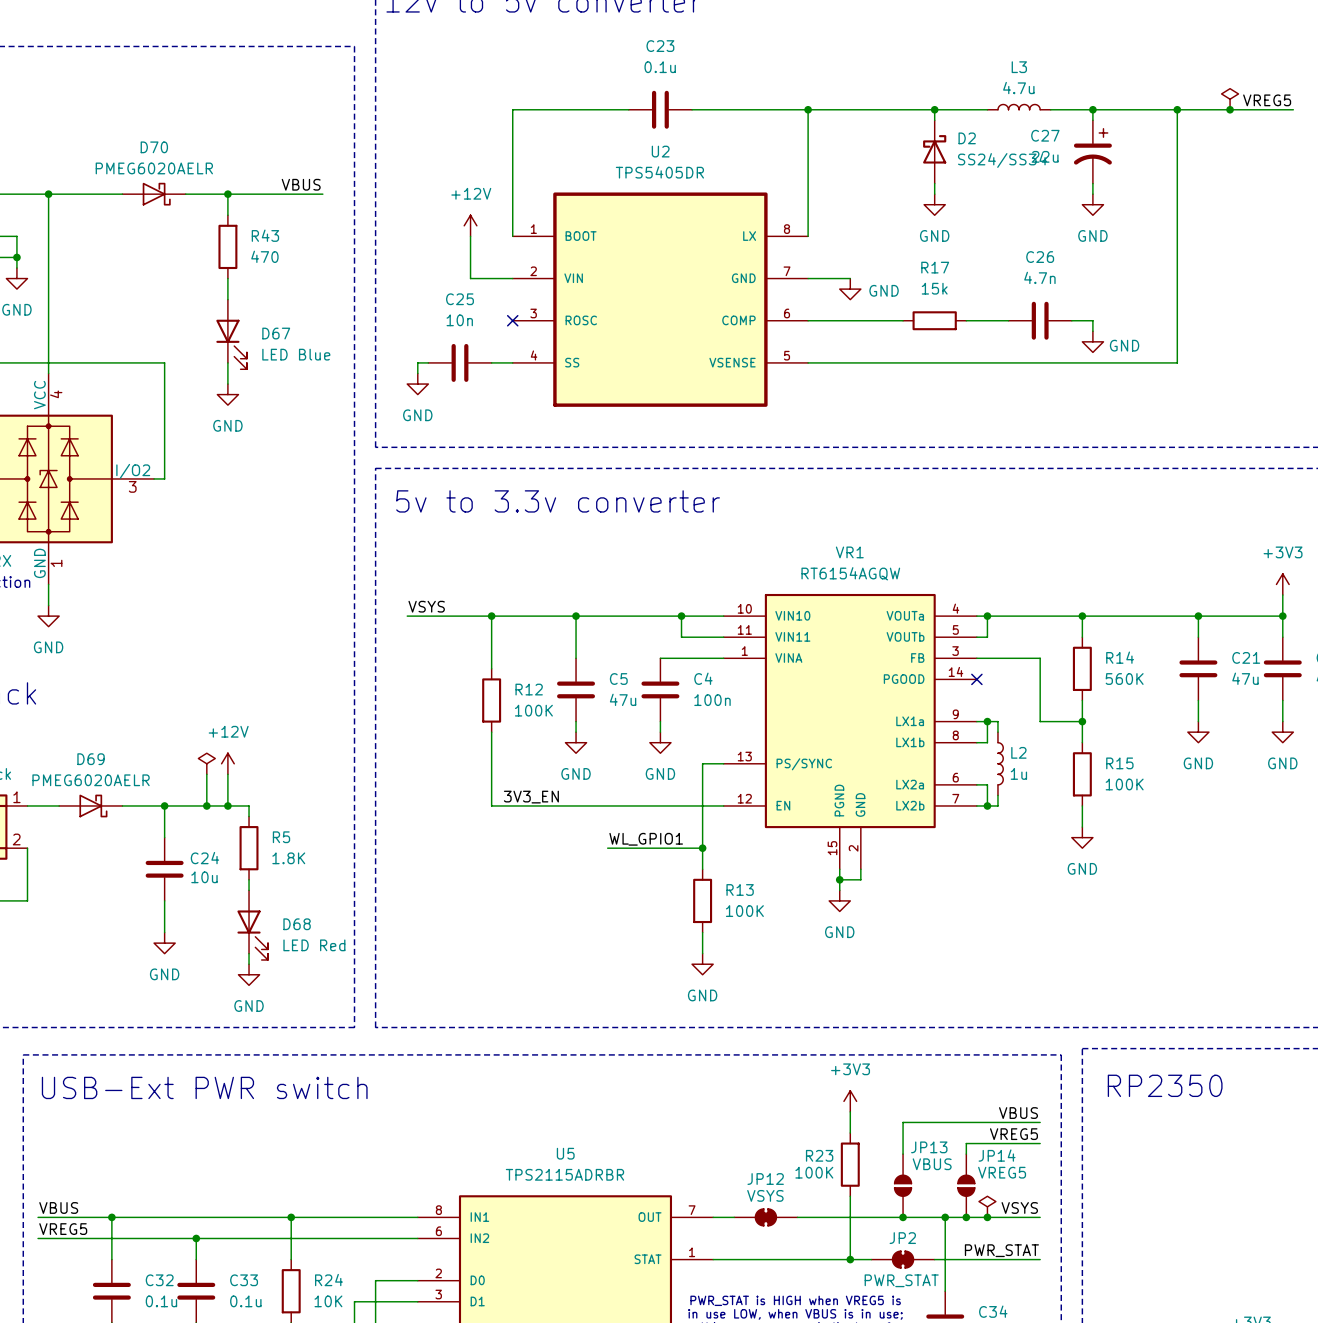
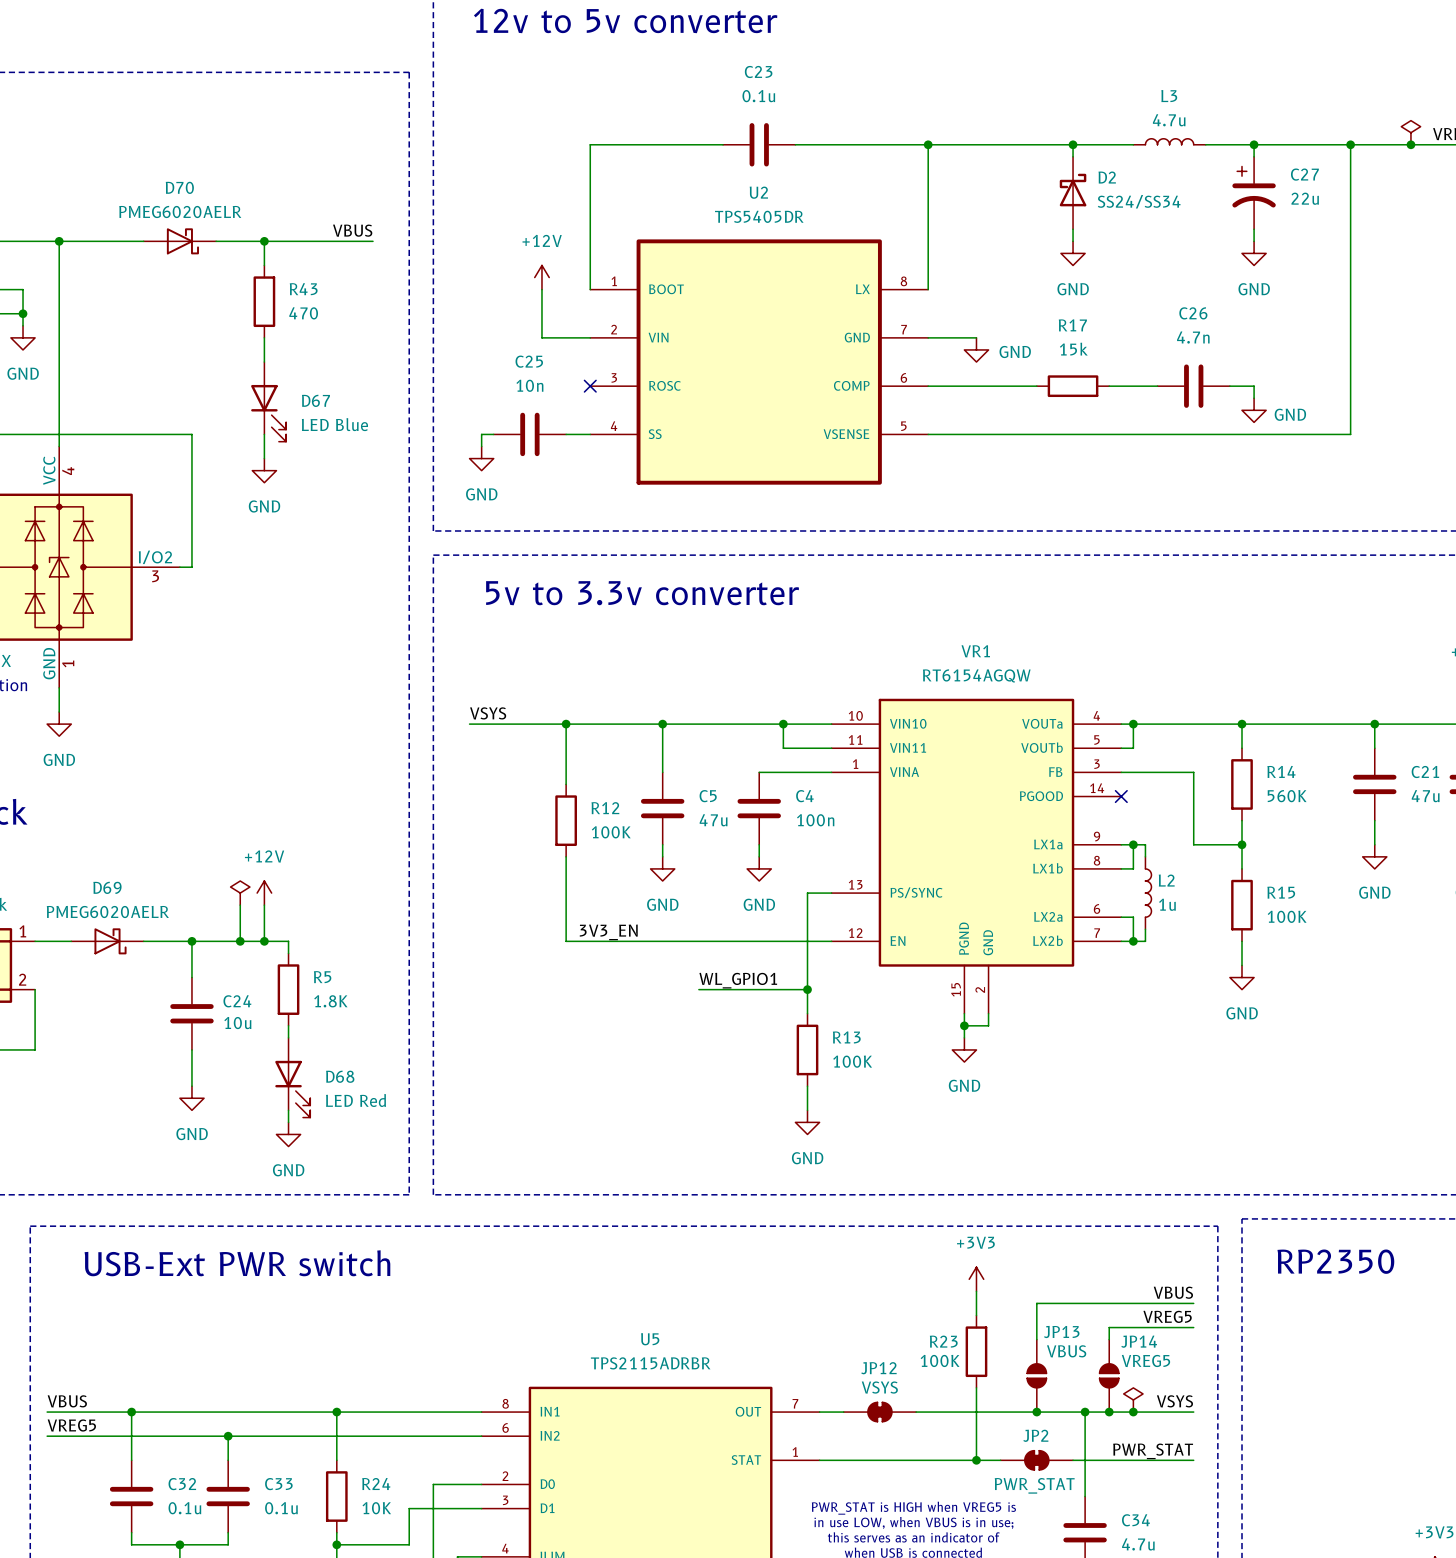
C27 flip: as is (1092, 146) -> left-right (1254, 187)

